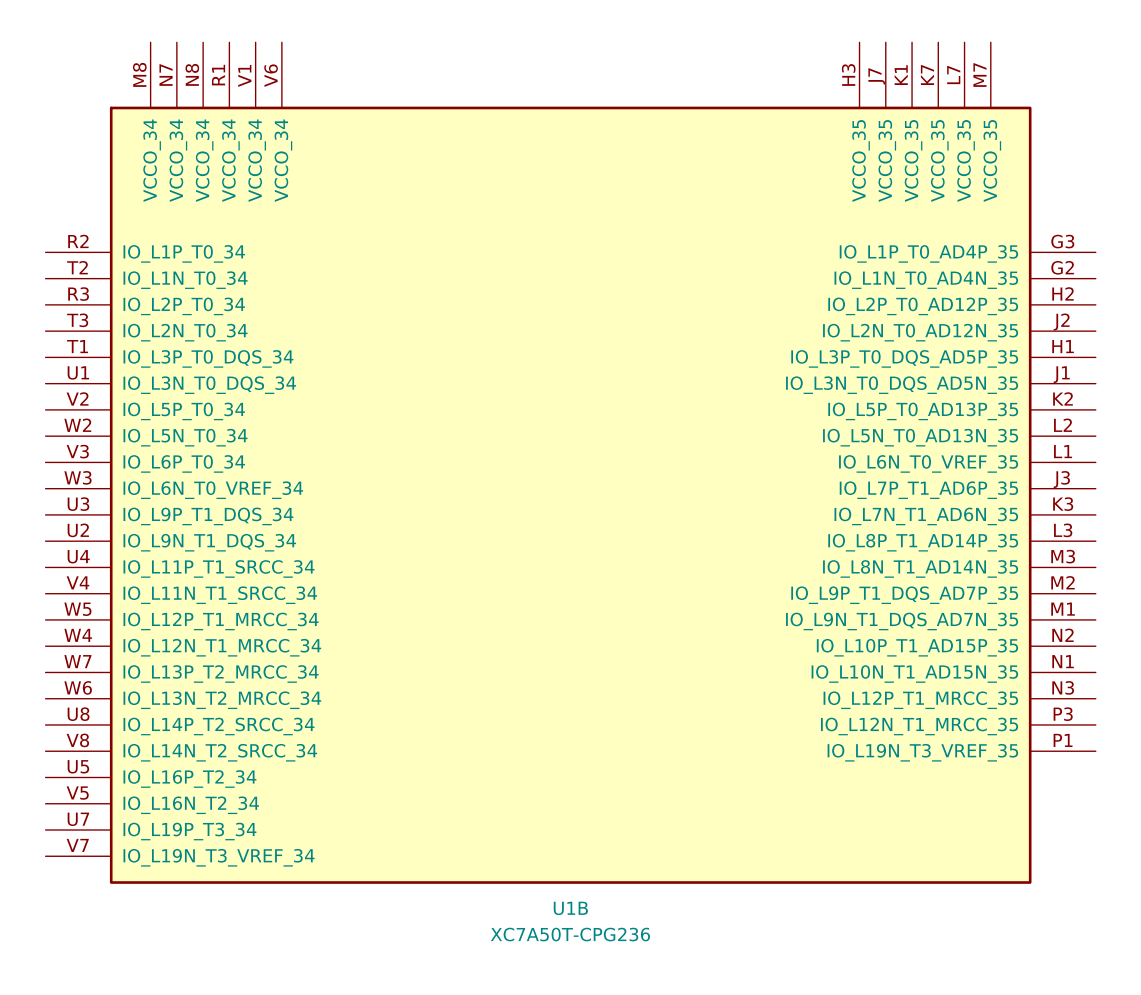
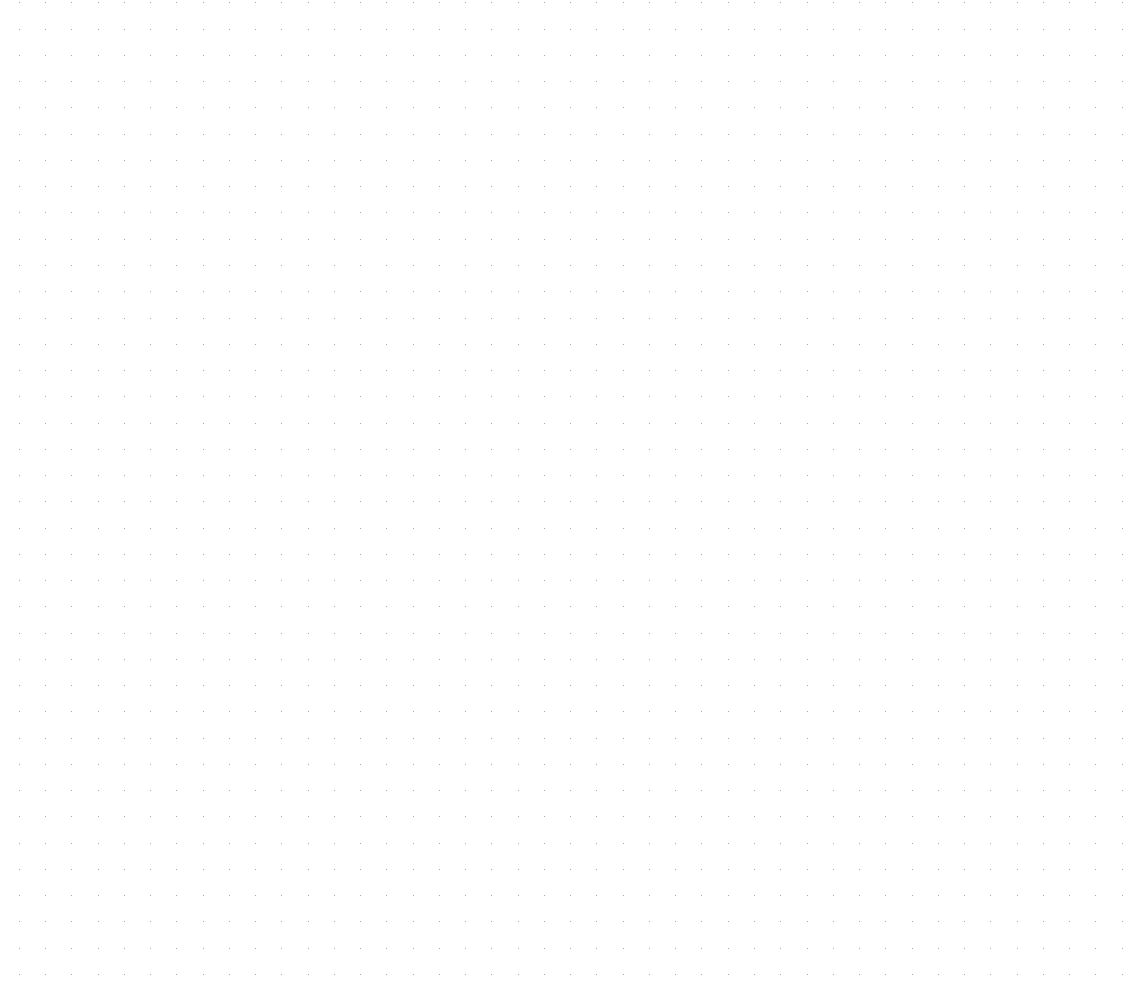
U1B: XC7A50T-CPG236 (570, 463) -> none

